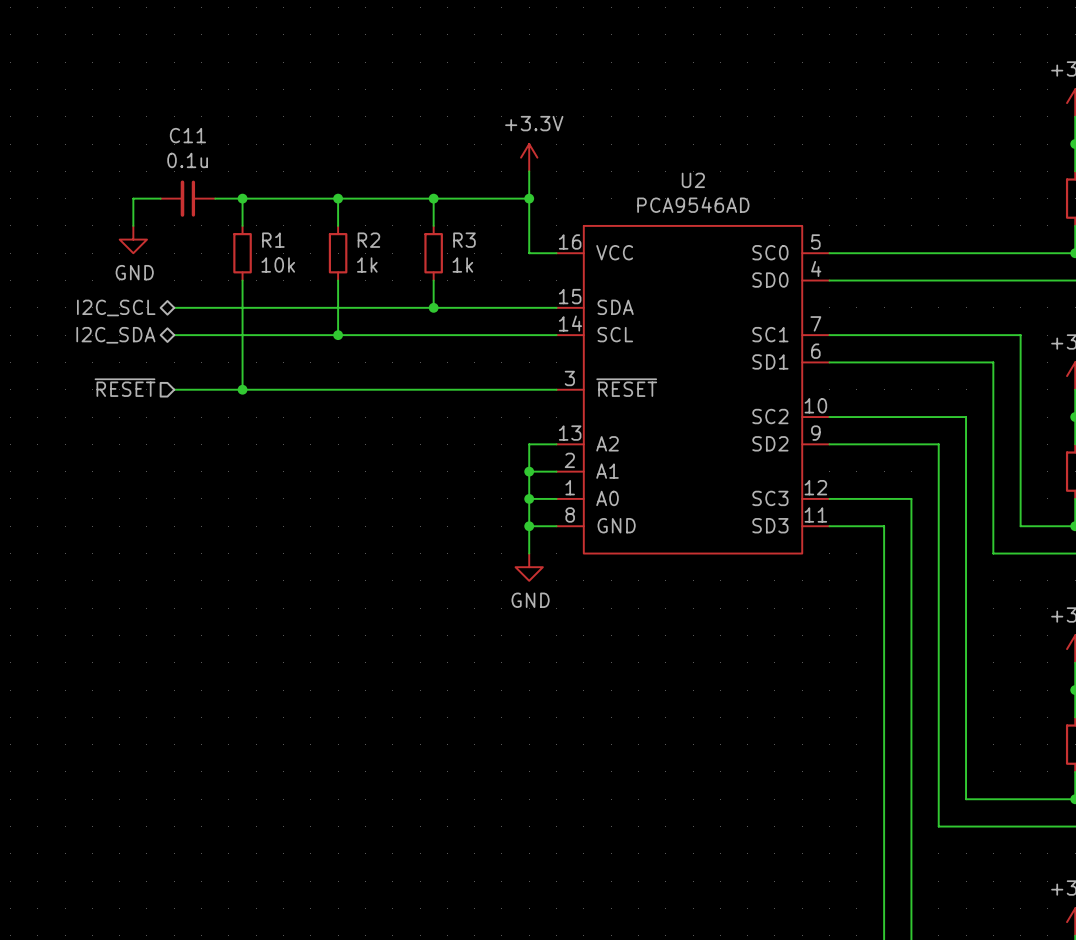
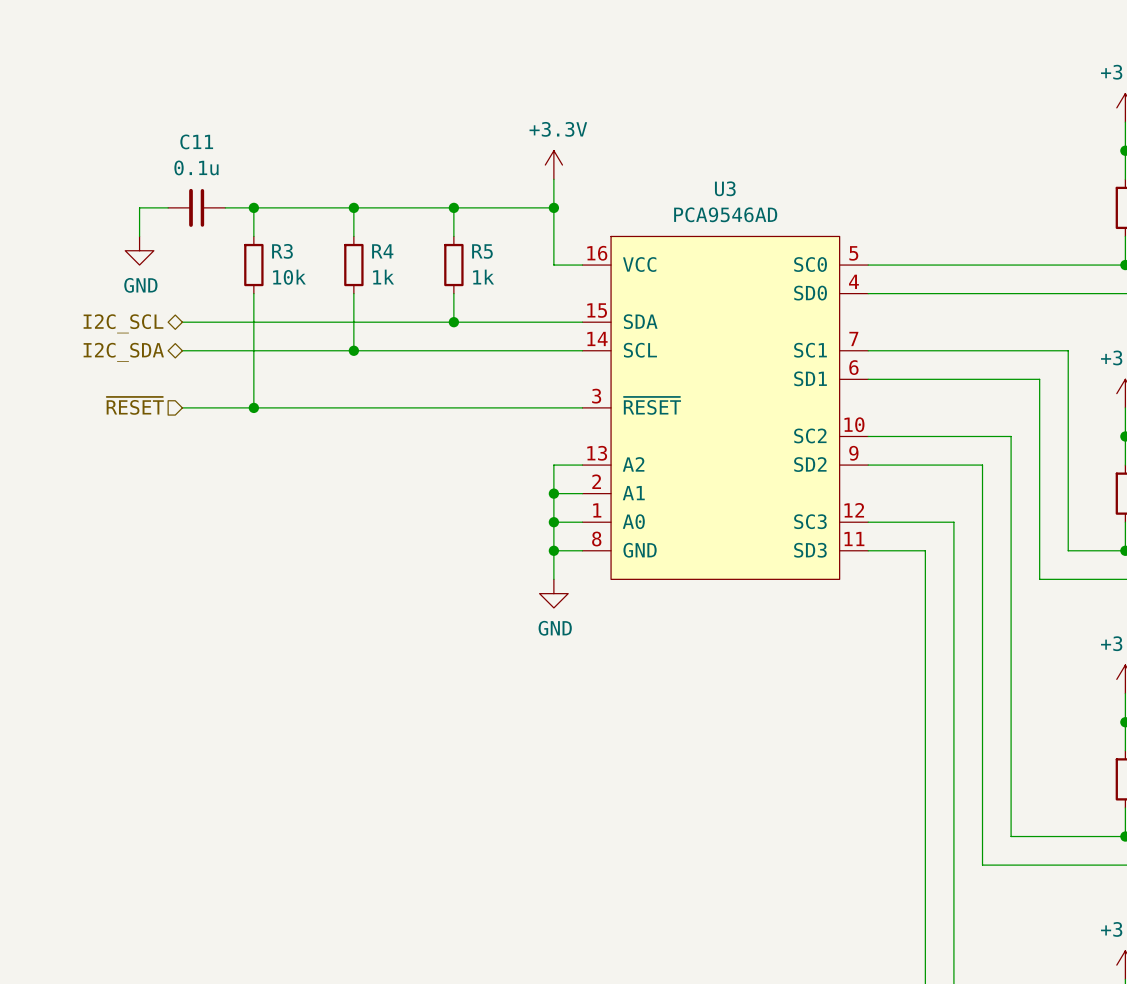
U2 name: U2 (693, 180) -> U3 (725, 188)
R1 name: R1 (273, 240) -> R3 (282, 251)
R2 name: R2 (368, 240) -> R4 (382, 251)
R3 name: R3 (464, 240) -> R5 (482, 251)

